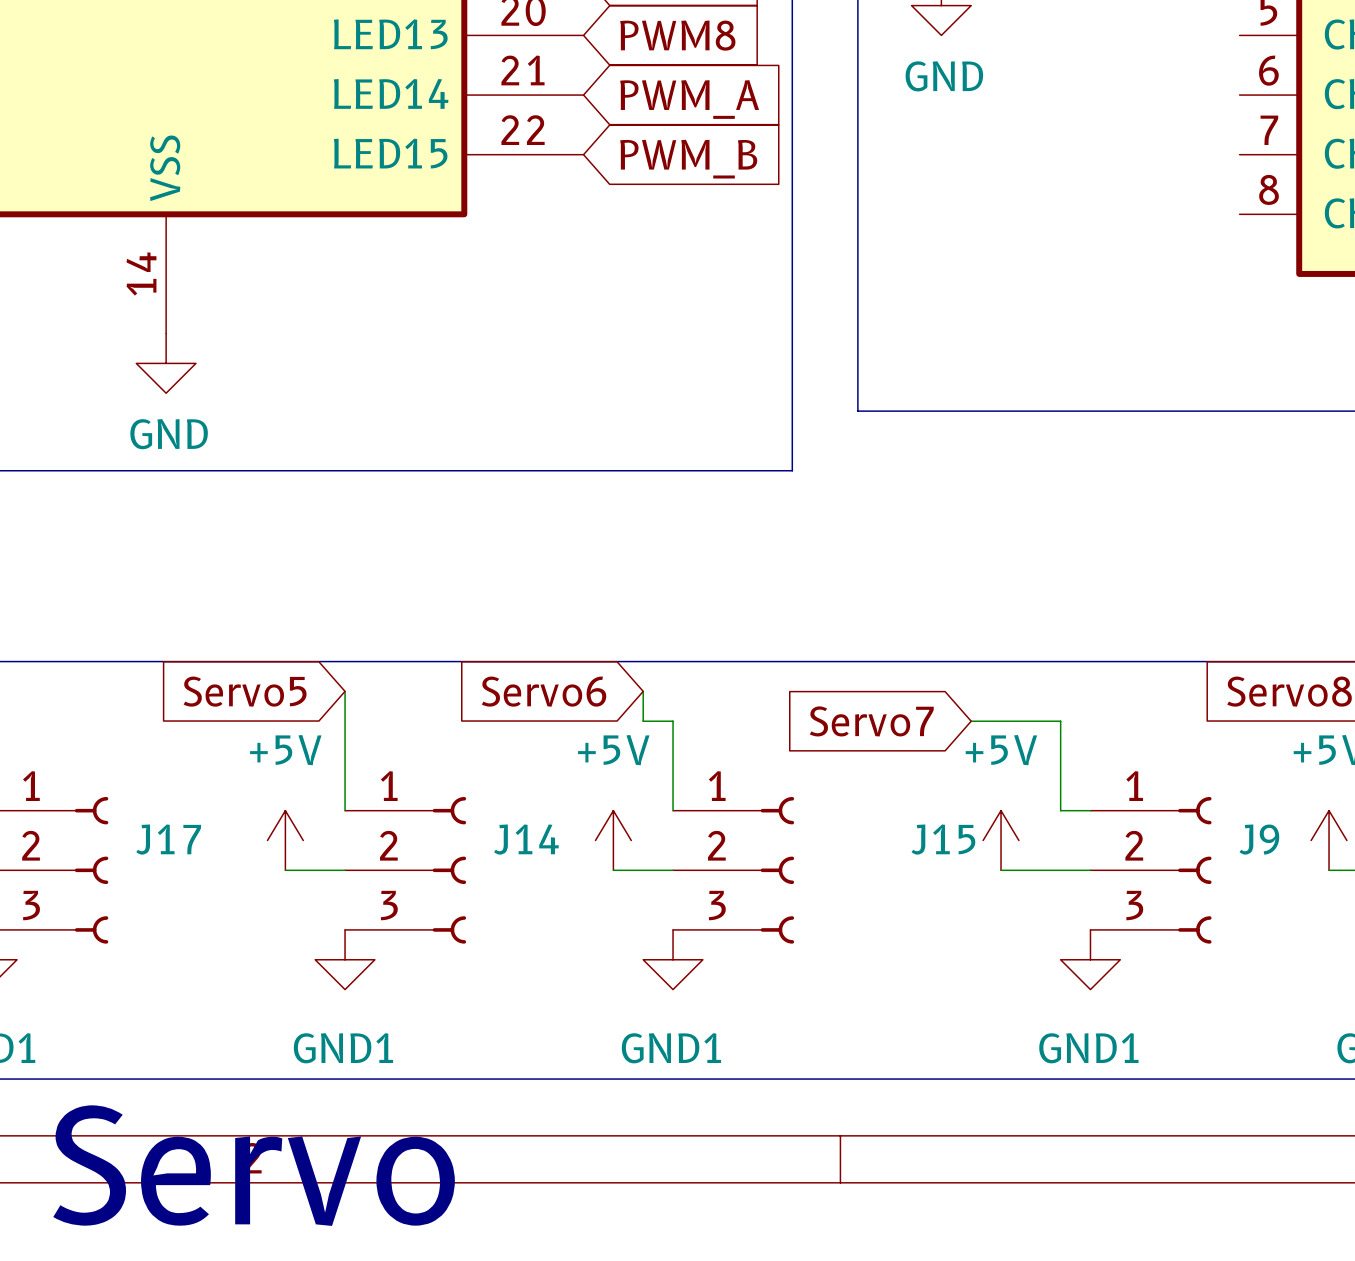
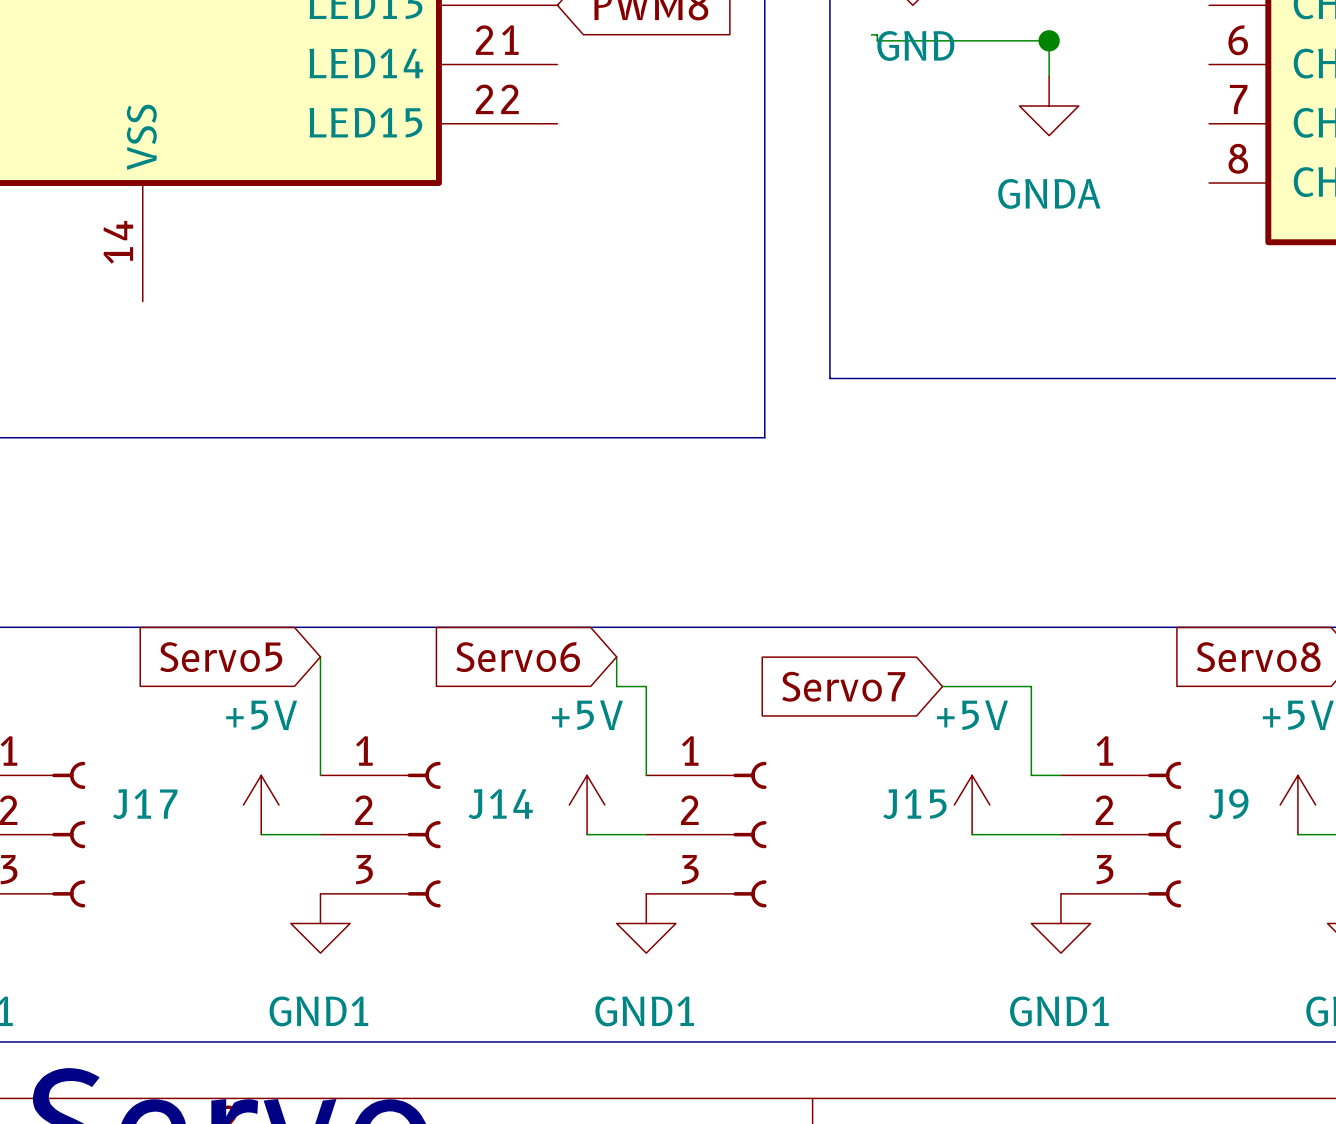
wire: none -> (871, 34) (877, 34) (877, 40) (1049, 40)
wire: none -> (1049, 34) (1049, 76)
junction: none -> (1049, 40)
global label: PWM_A (689, 99) -> none
power symbol: none -> GNDA (1049, 105)
global label: PWM_B (688, 159) -> none
power symbol: GND (166, 363) -> none

